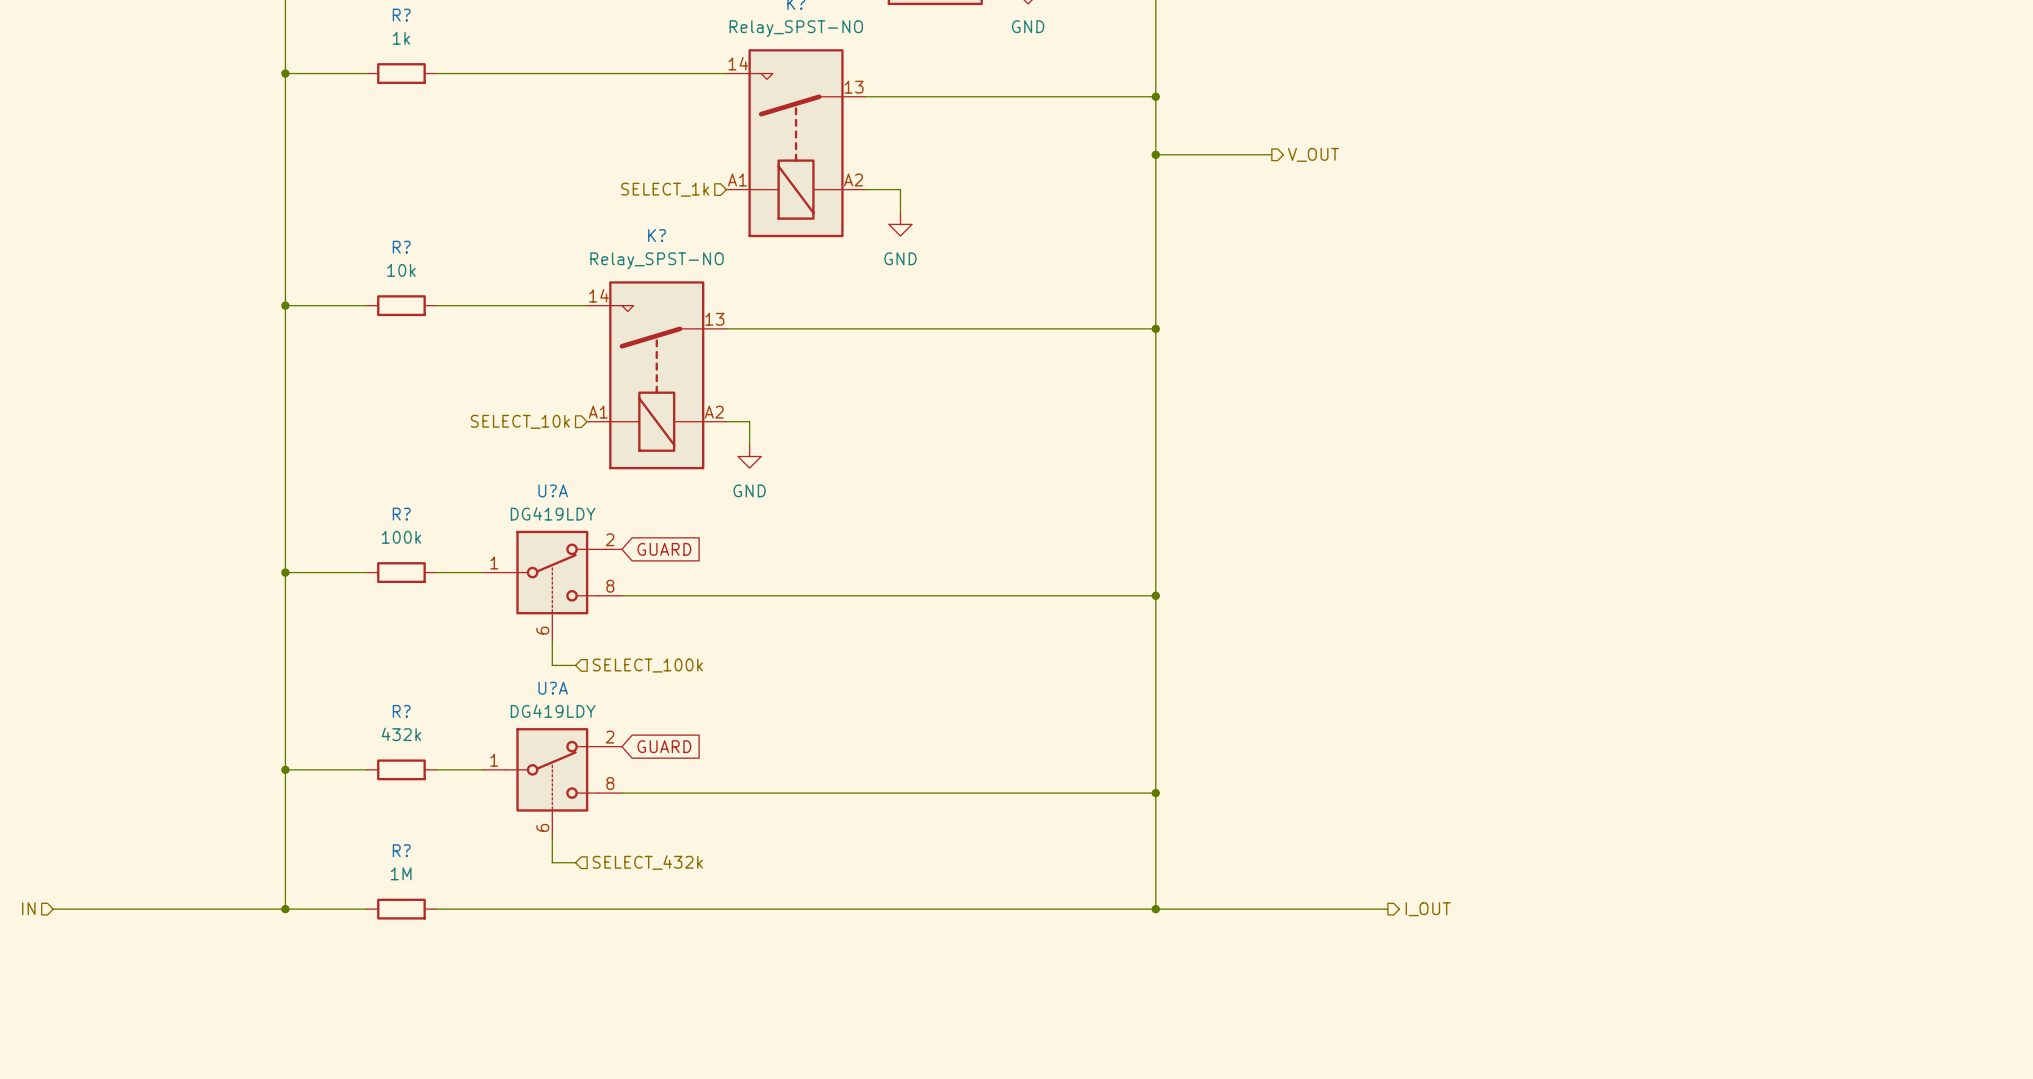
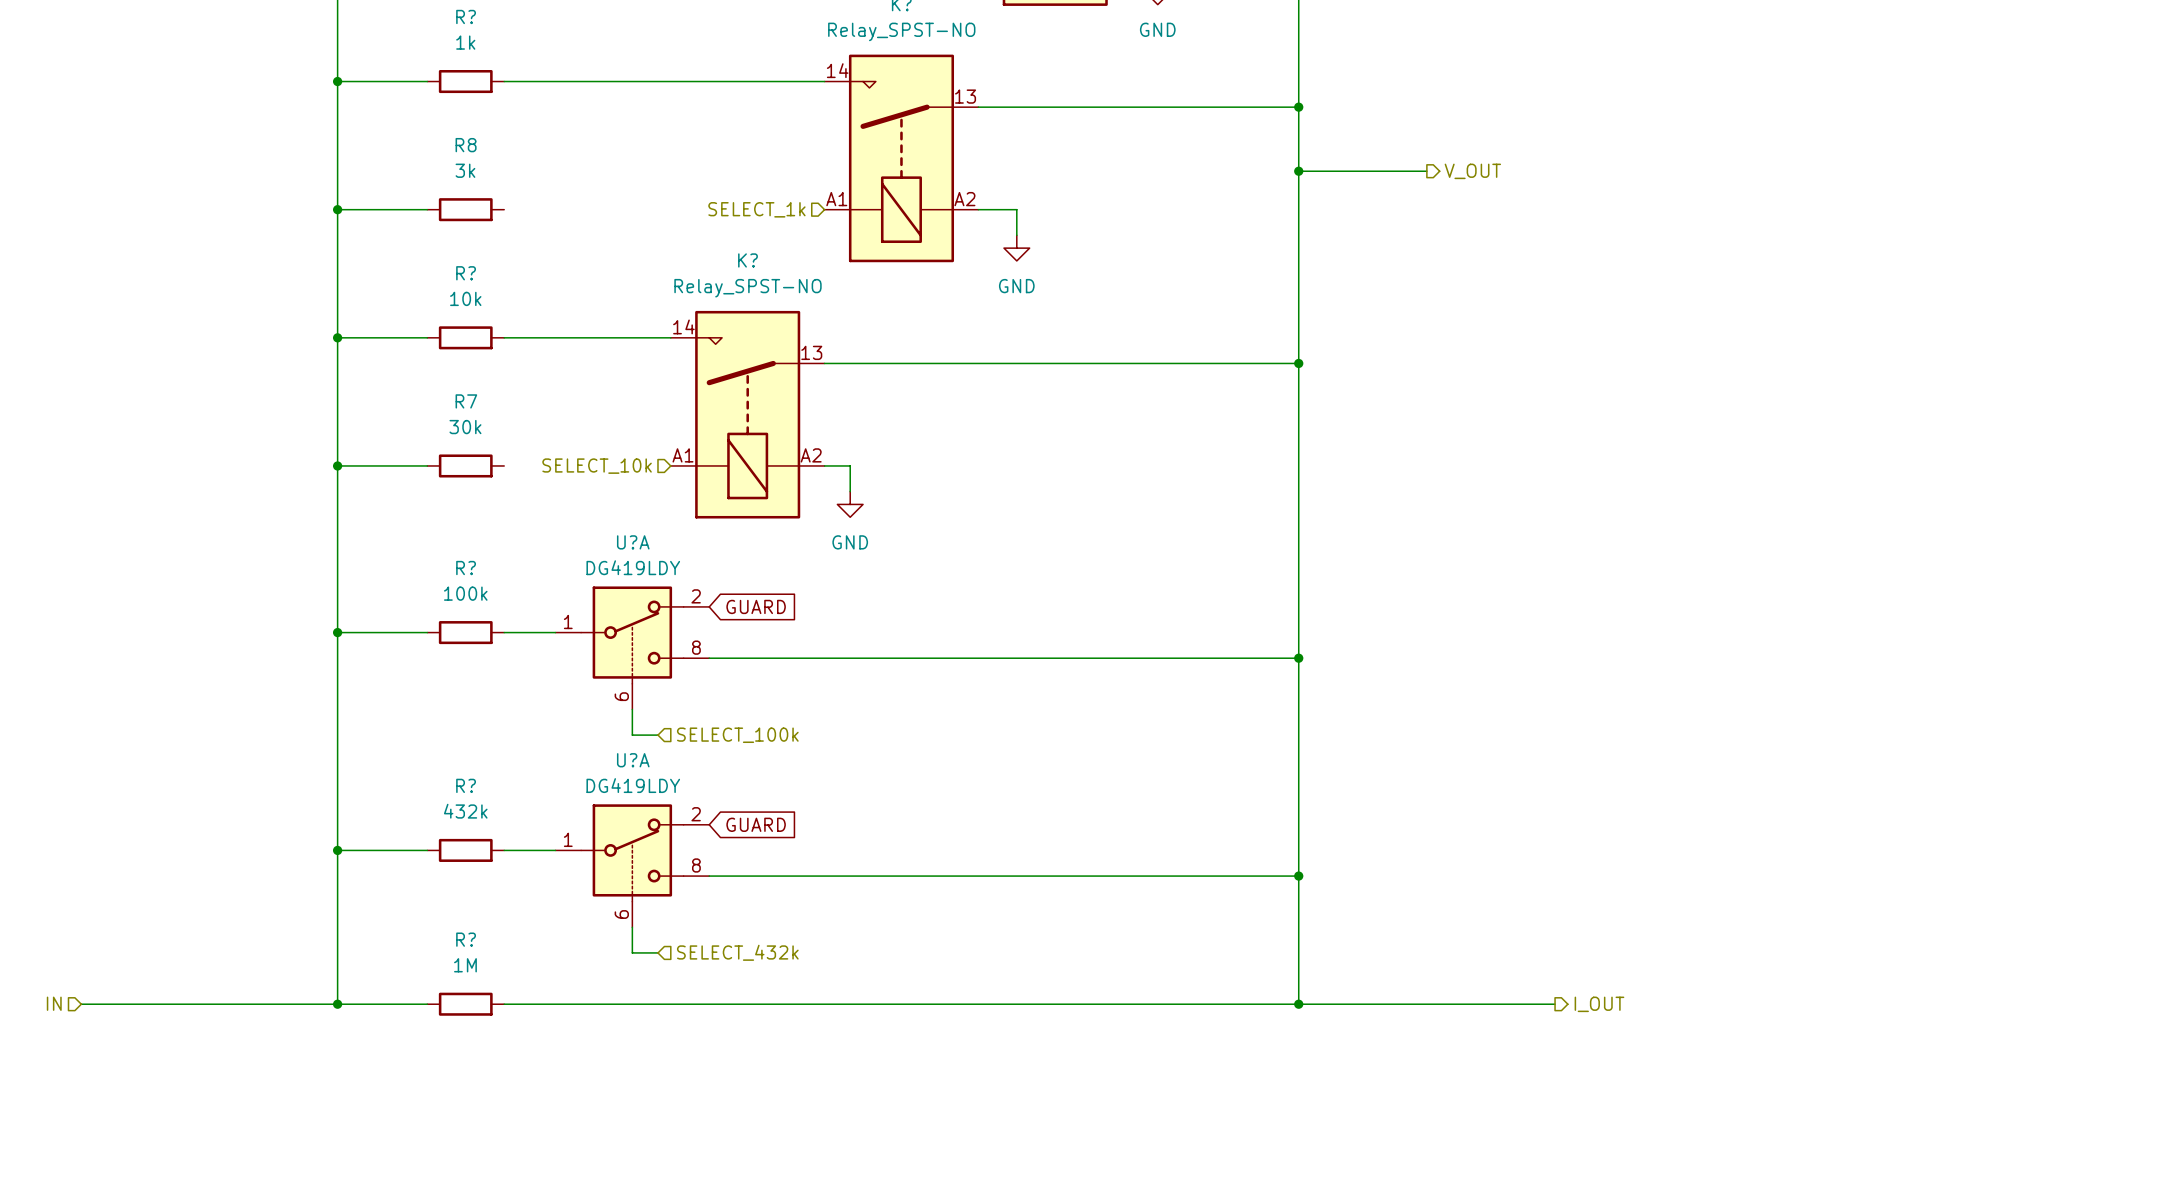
wire: none -> (337, 209) (427, 209)
junction: none -> (337, 209)
R8: none -> 3k (465, 209)
wire: none -> (337, 465) (427, 465)
junction: none -> (337, 465)
R7: none -> 30k (465, 465)

